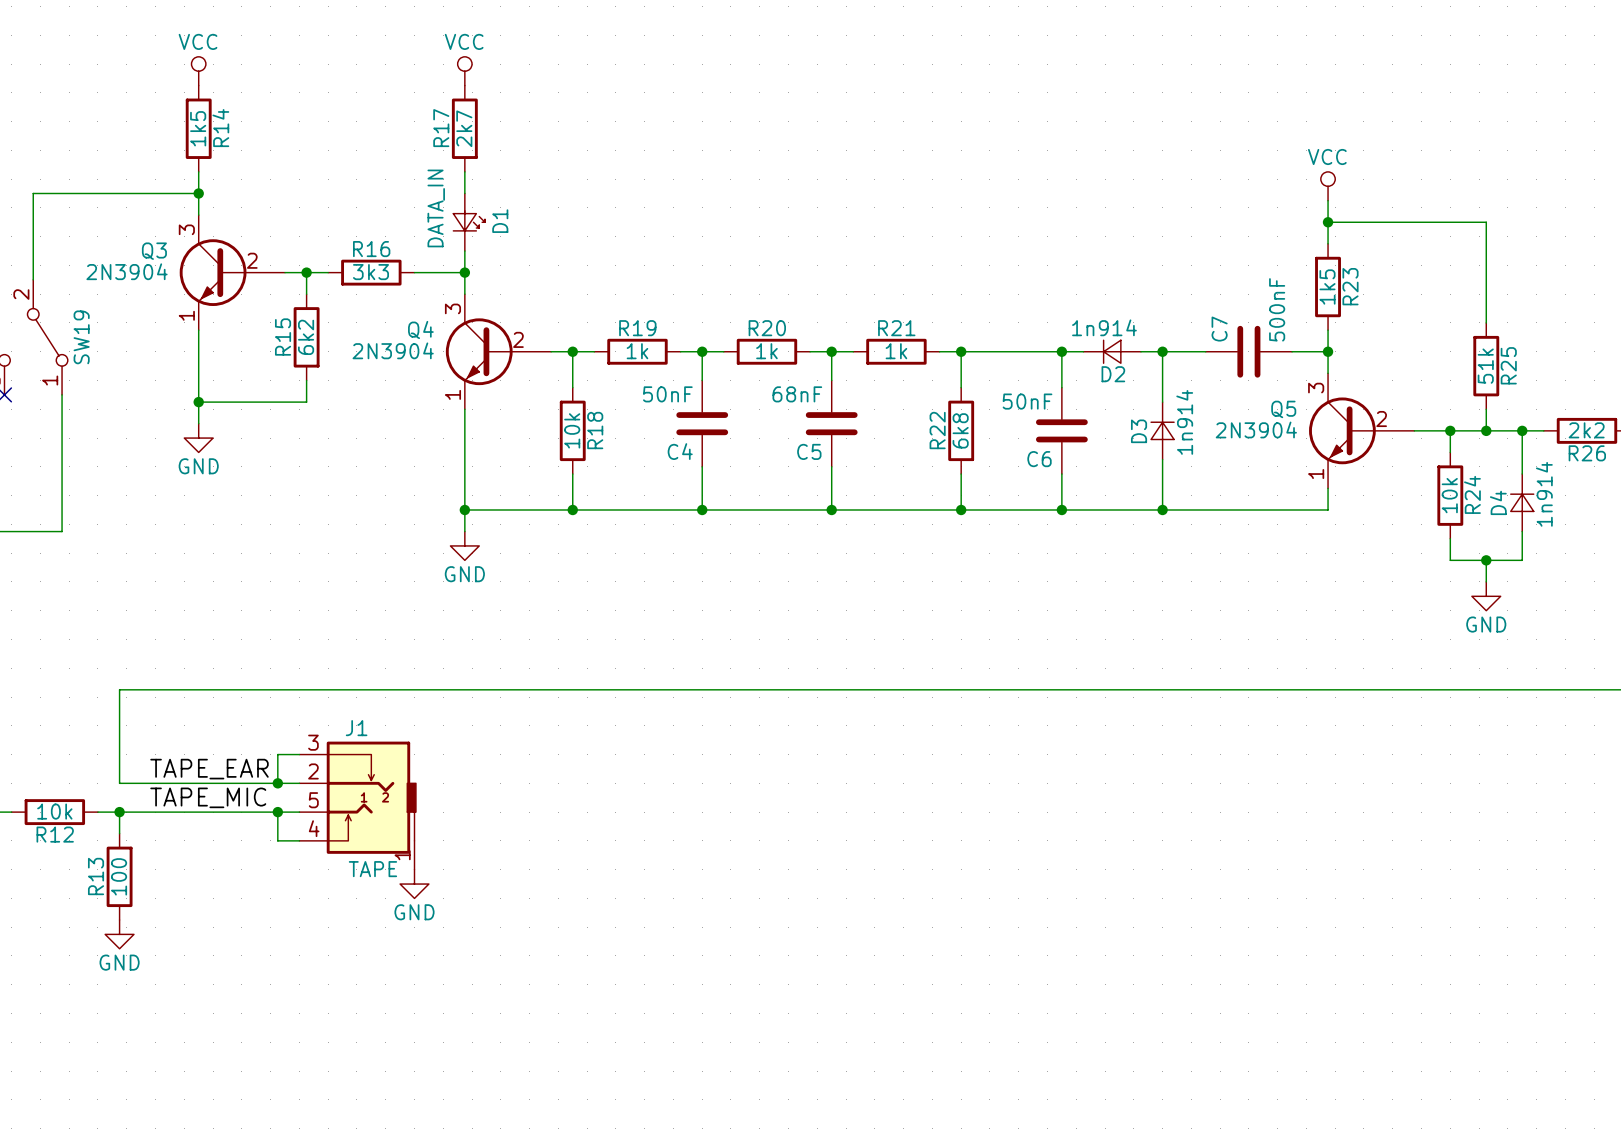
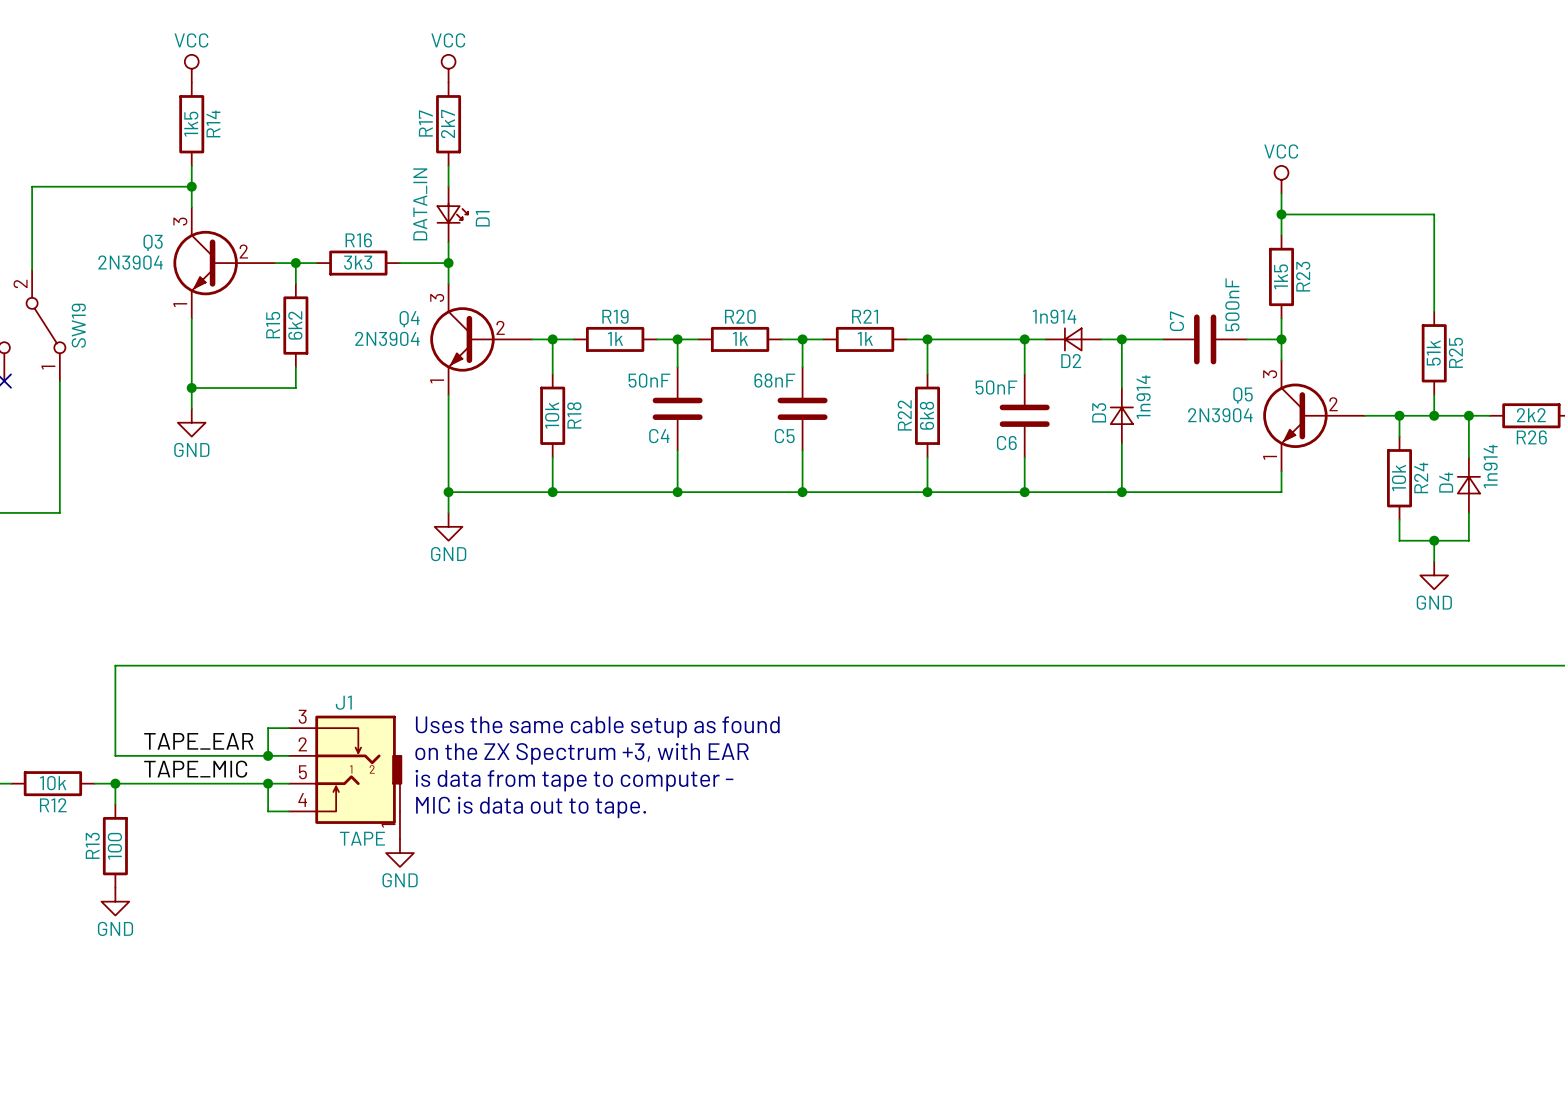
text: none -> Uses the same cable setup as found (597, 727)
text: none -> on the ZX Spectrum +3, with EAR (582, 753)
text: none -> is data from tape to computer - (574, 780)
text: none -> MIC is data out to tape. (531, 807)

